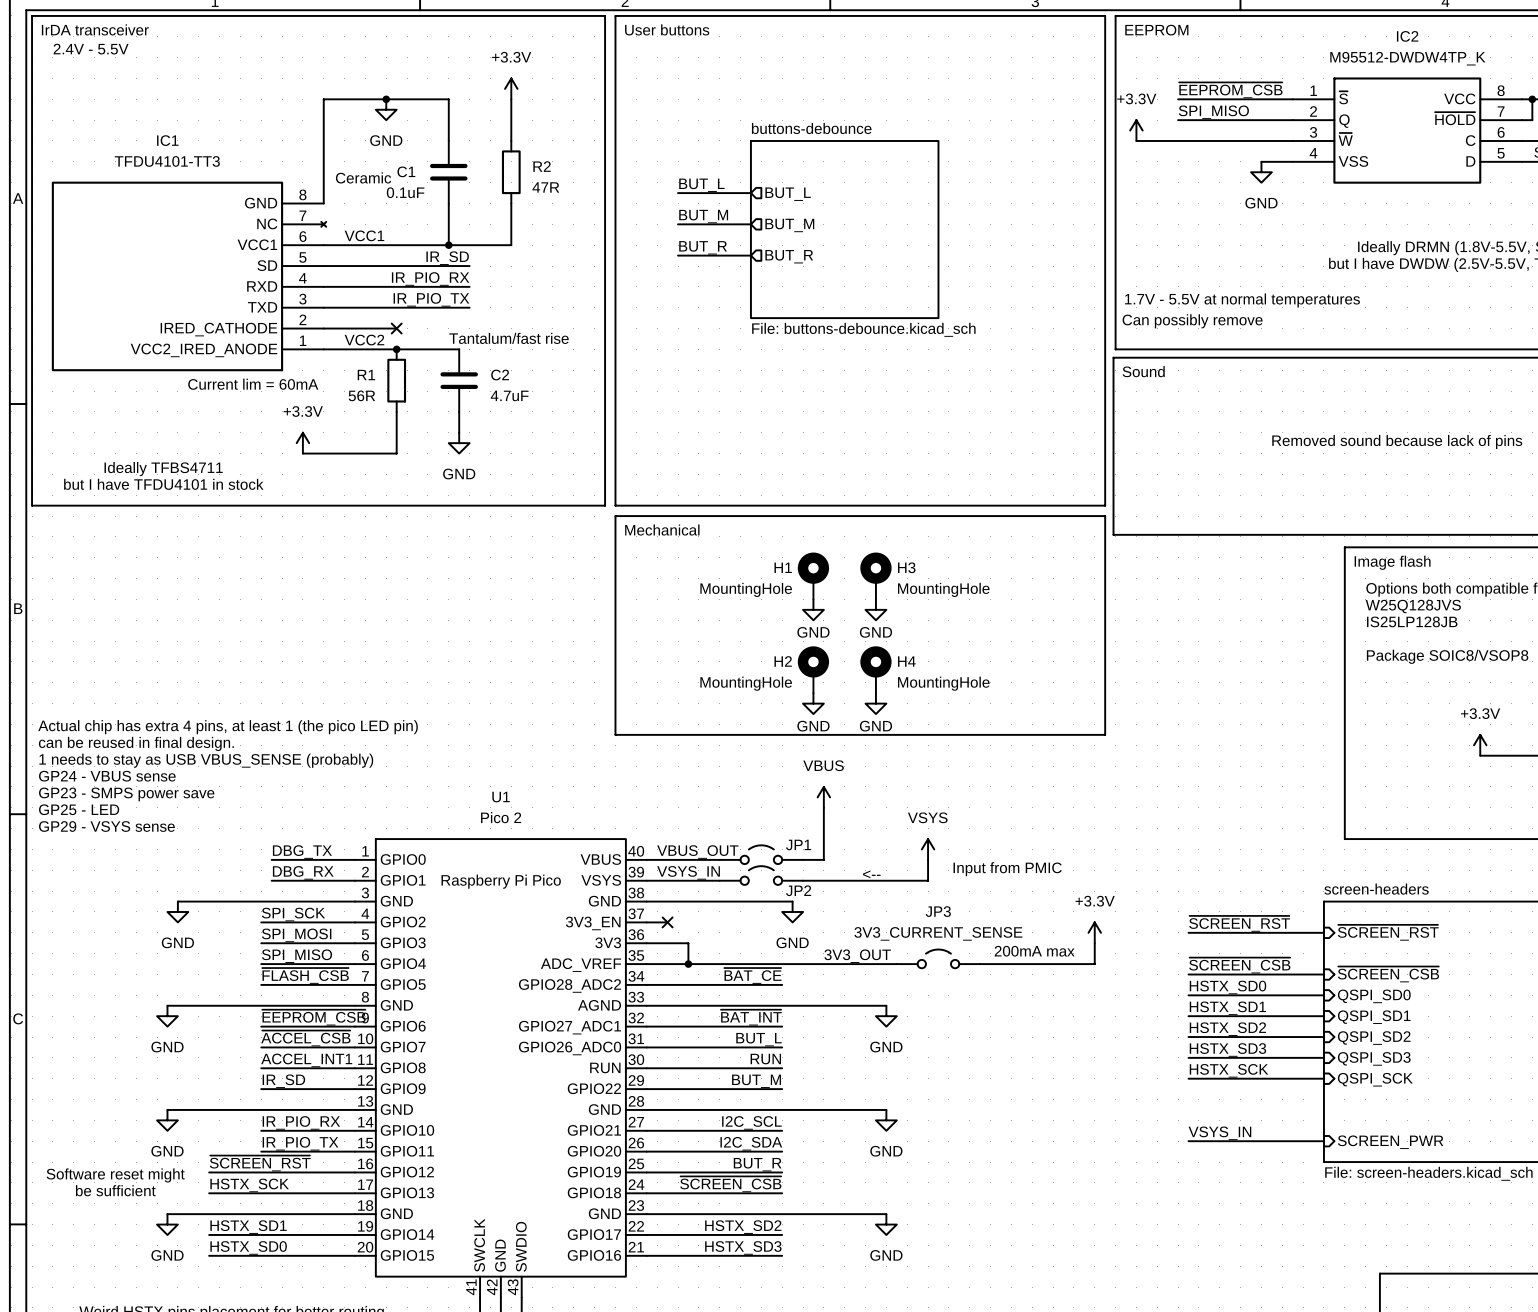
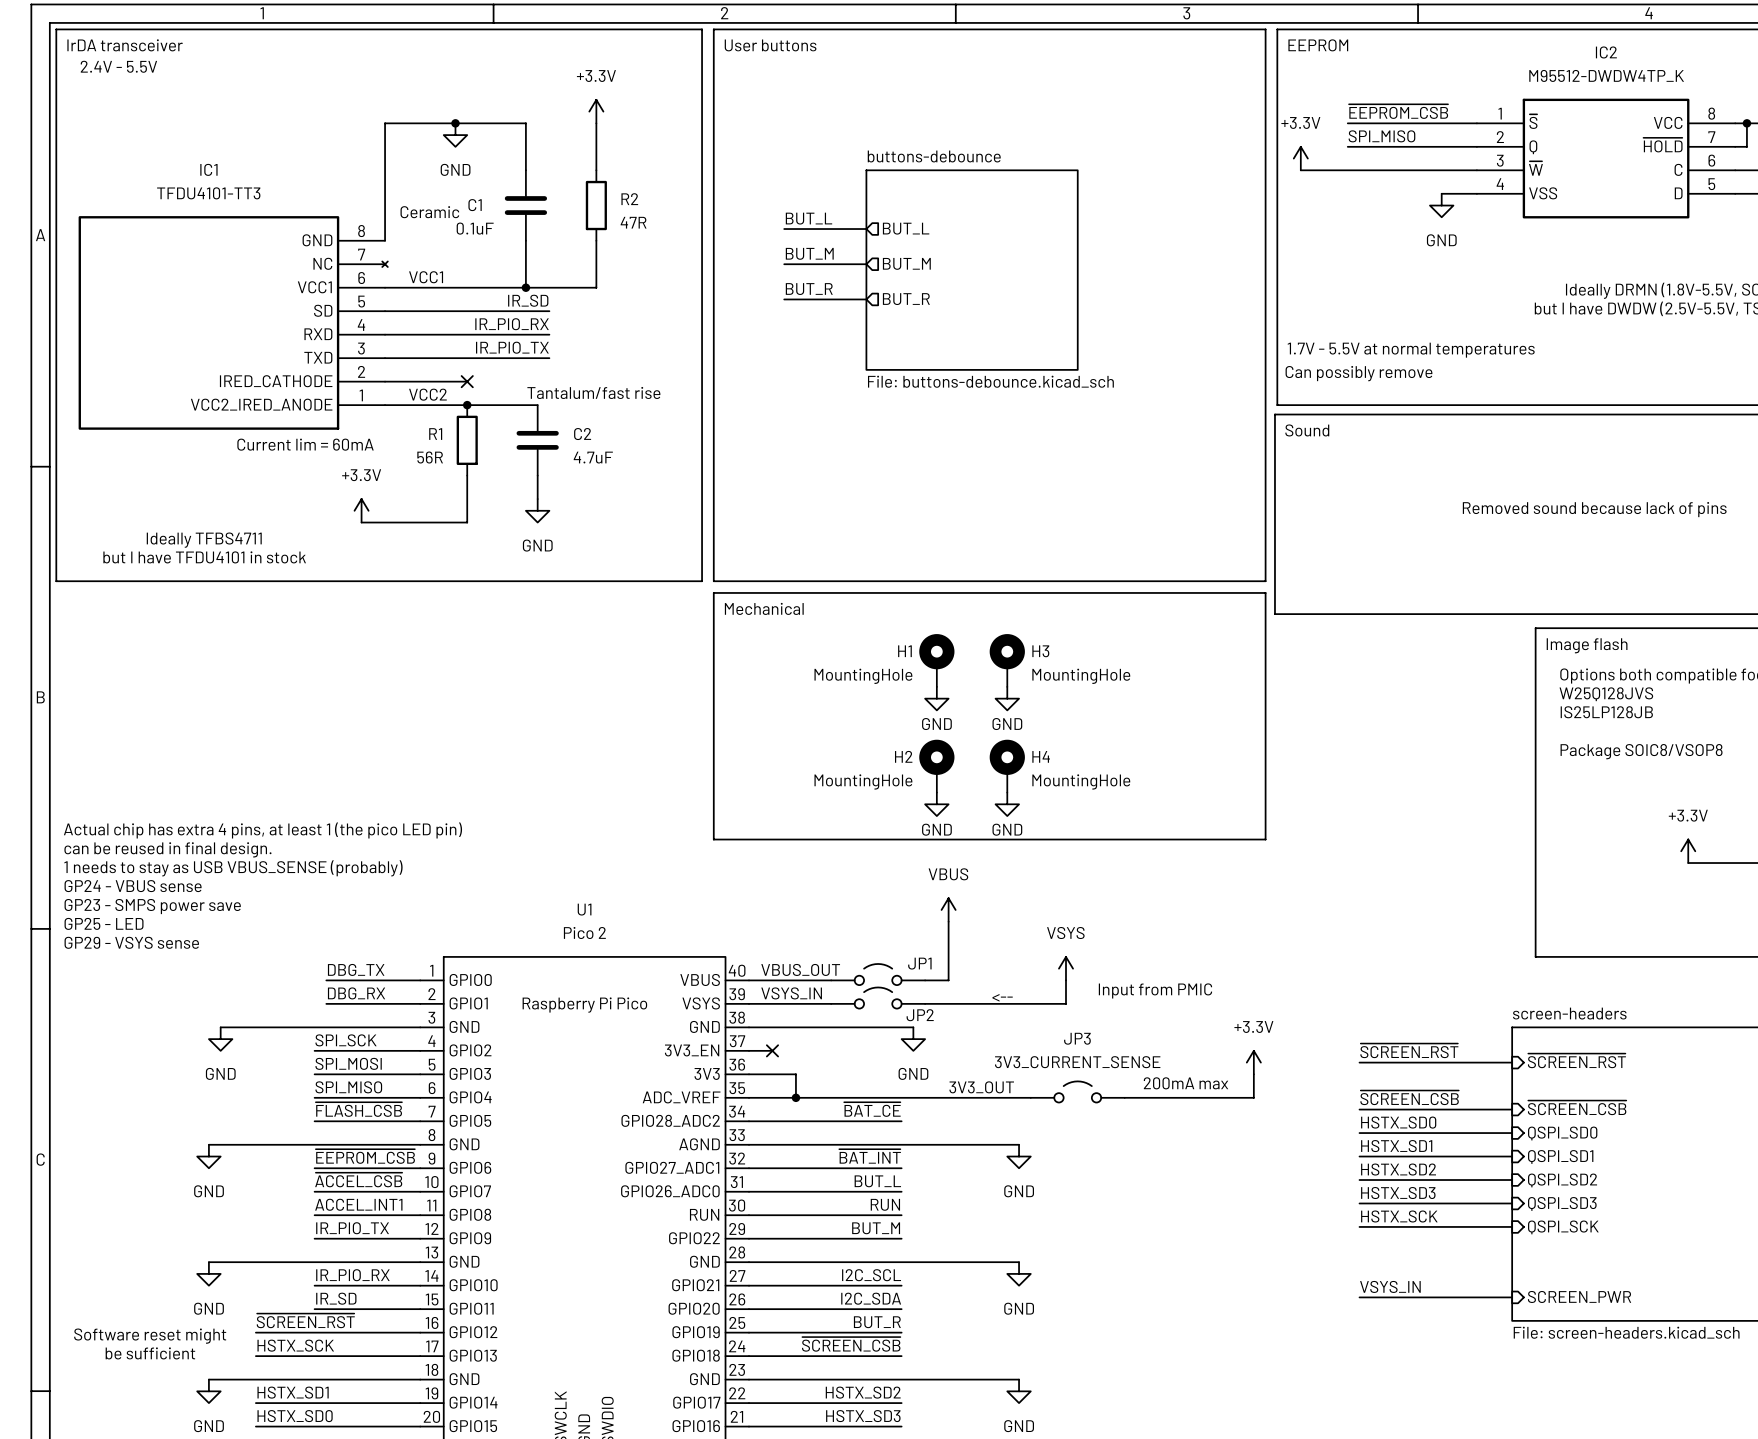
label: IR_SD (283, 1081) -> IR_PIO_TX (352, 1228)
label: IR_PIO_TX (300, 1143) -> IR_SD (336, 1298)

